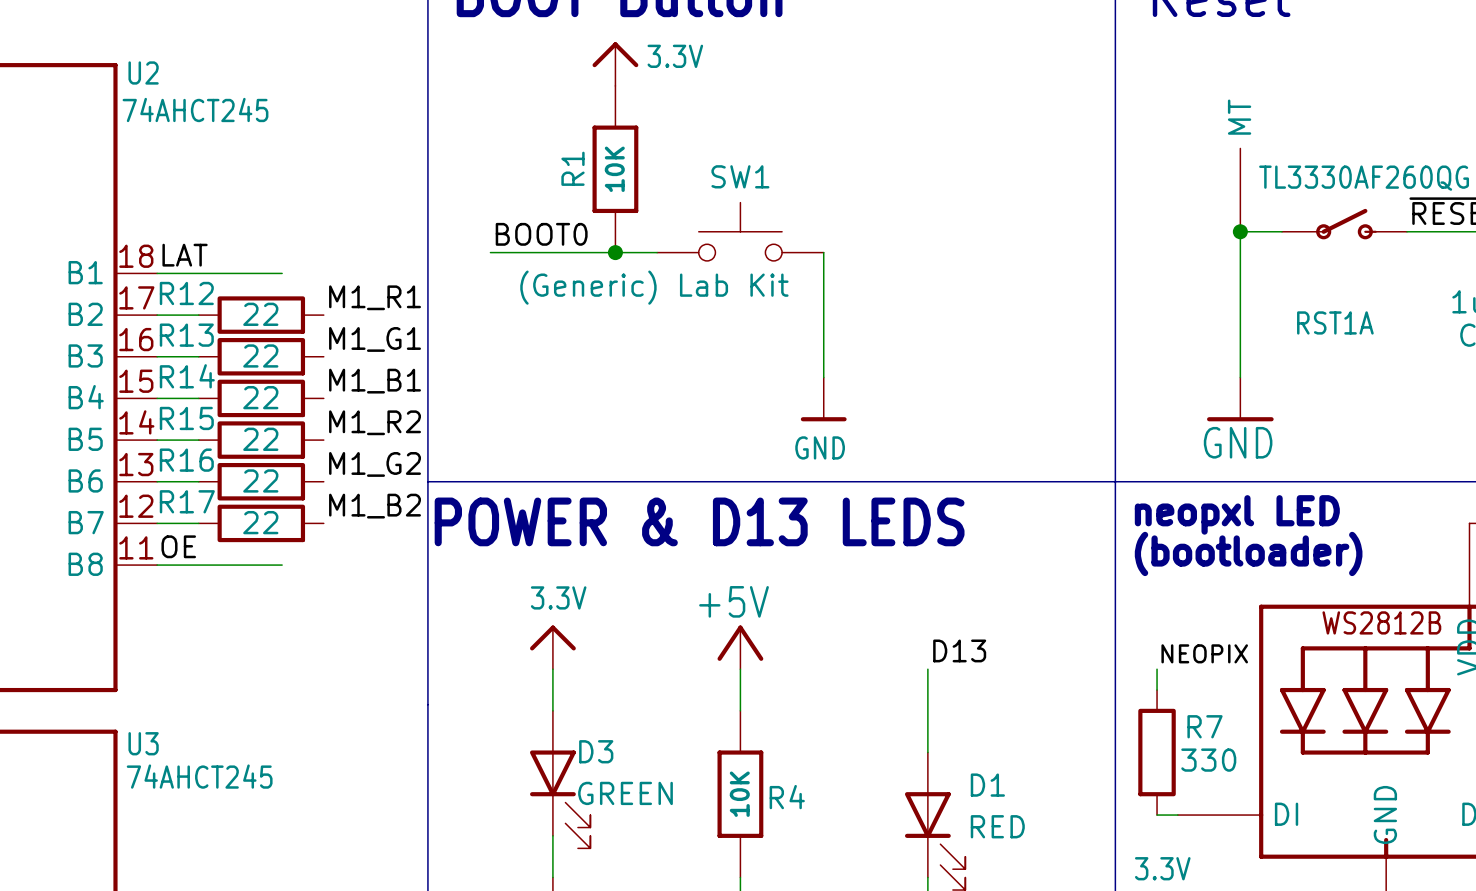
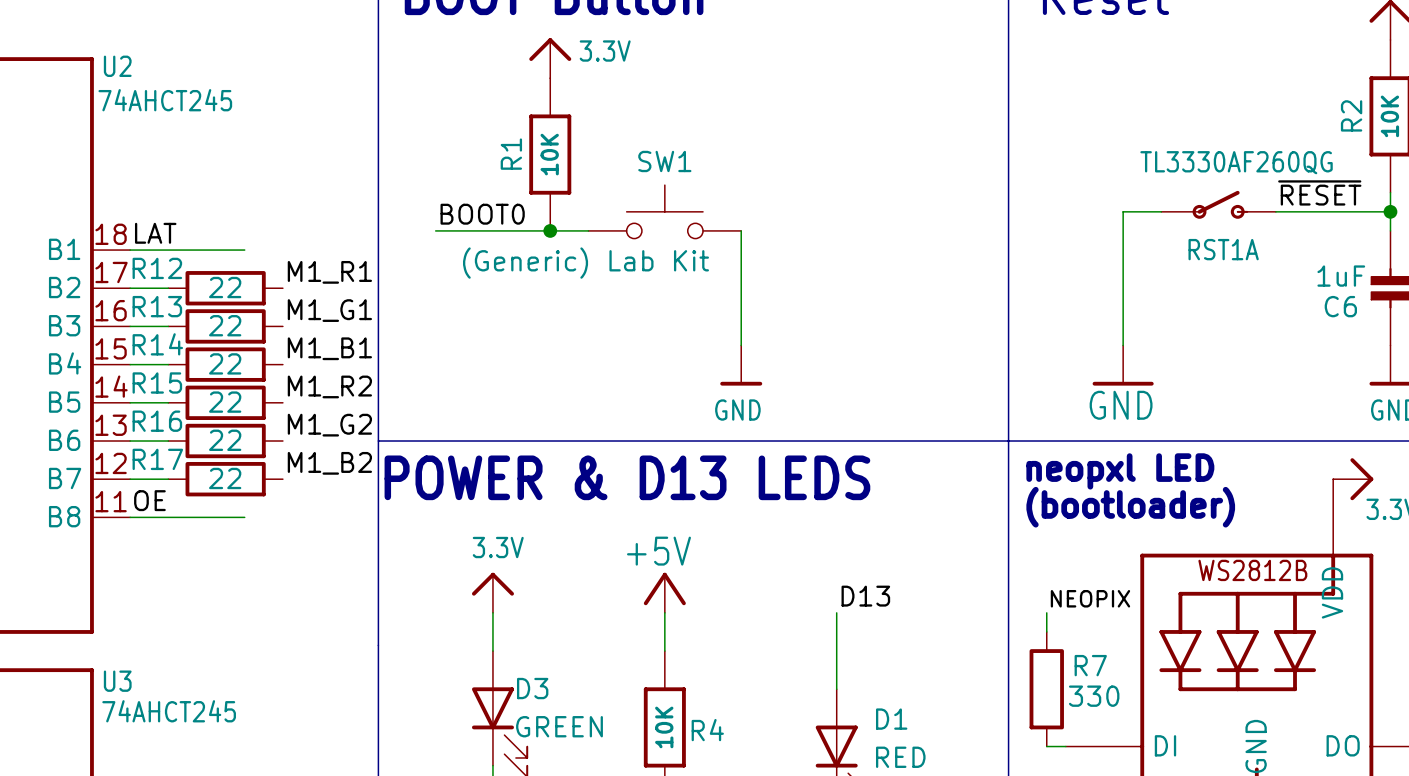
part: (1240, 190) -> none
junction: (1240, 231) -> none
RST1A name position: RST1A (1335, 322) -> RST1A (1223, 249)

